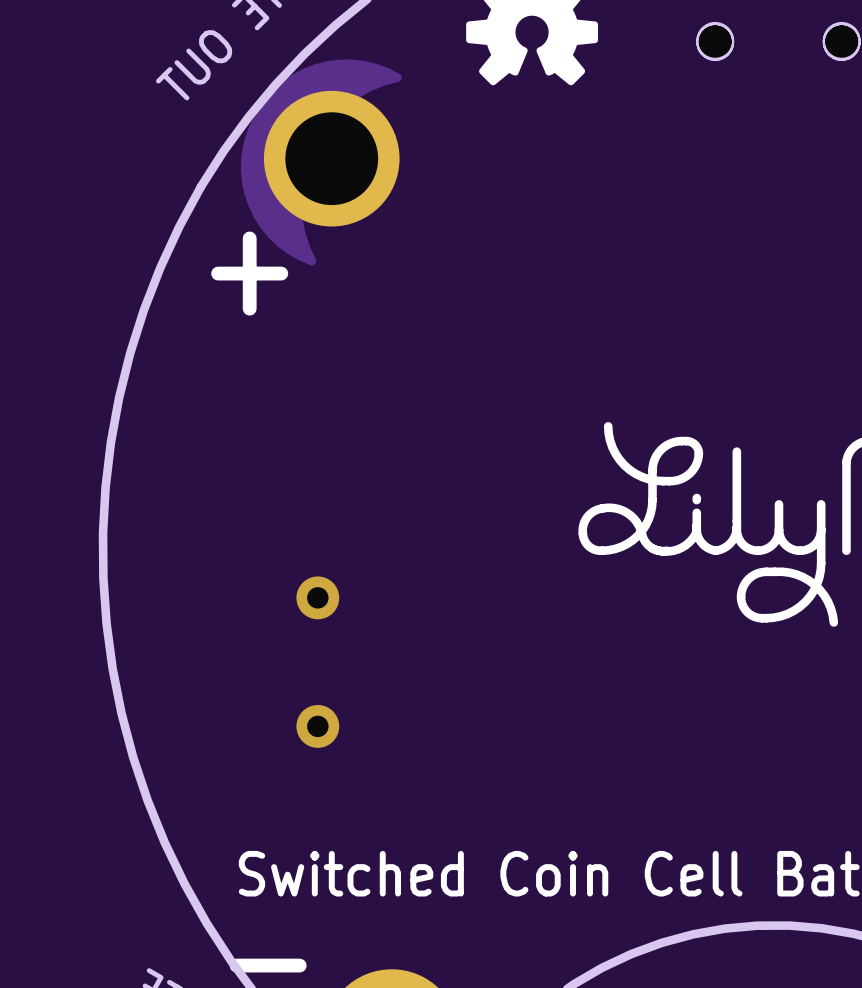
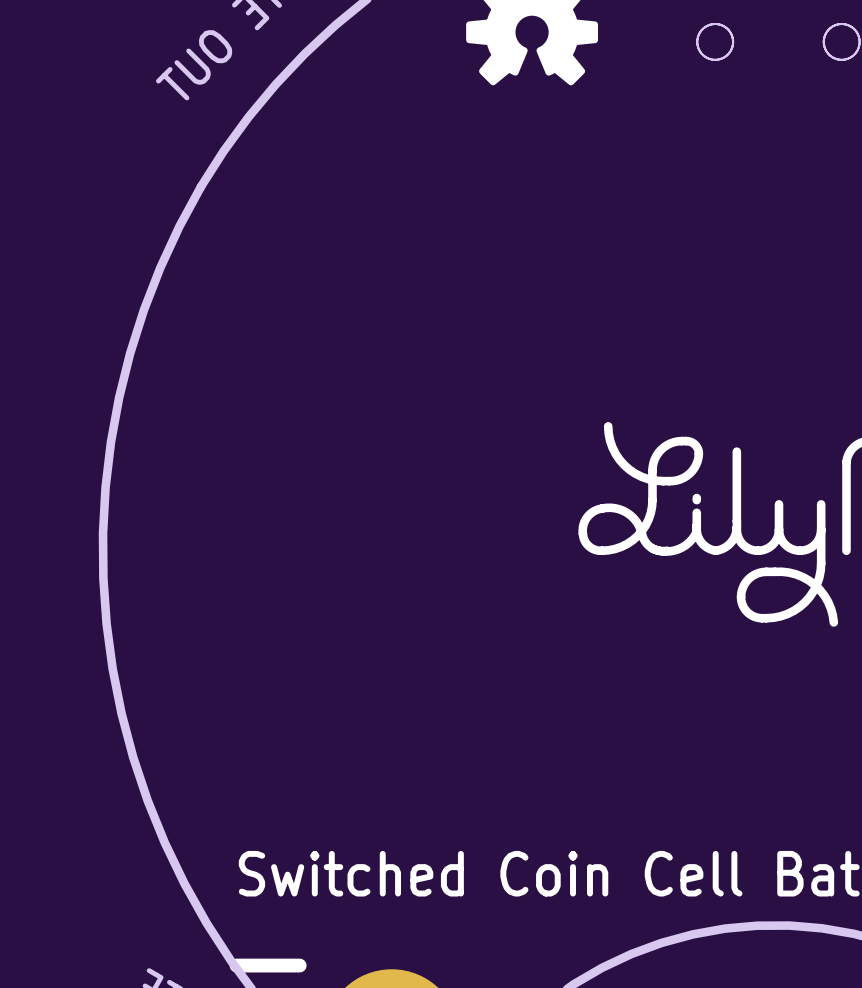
part: (778, 40) -> none
part: (321, 162) -> none
text: + (249, 273) -> none
via: (317, 597) -> none
via: (317, 726) -> none

